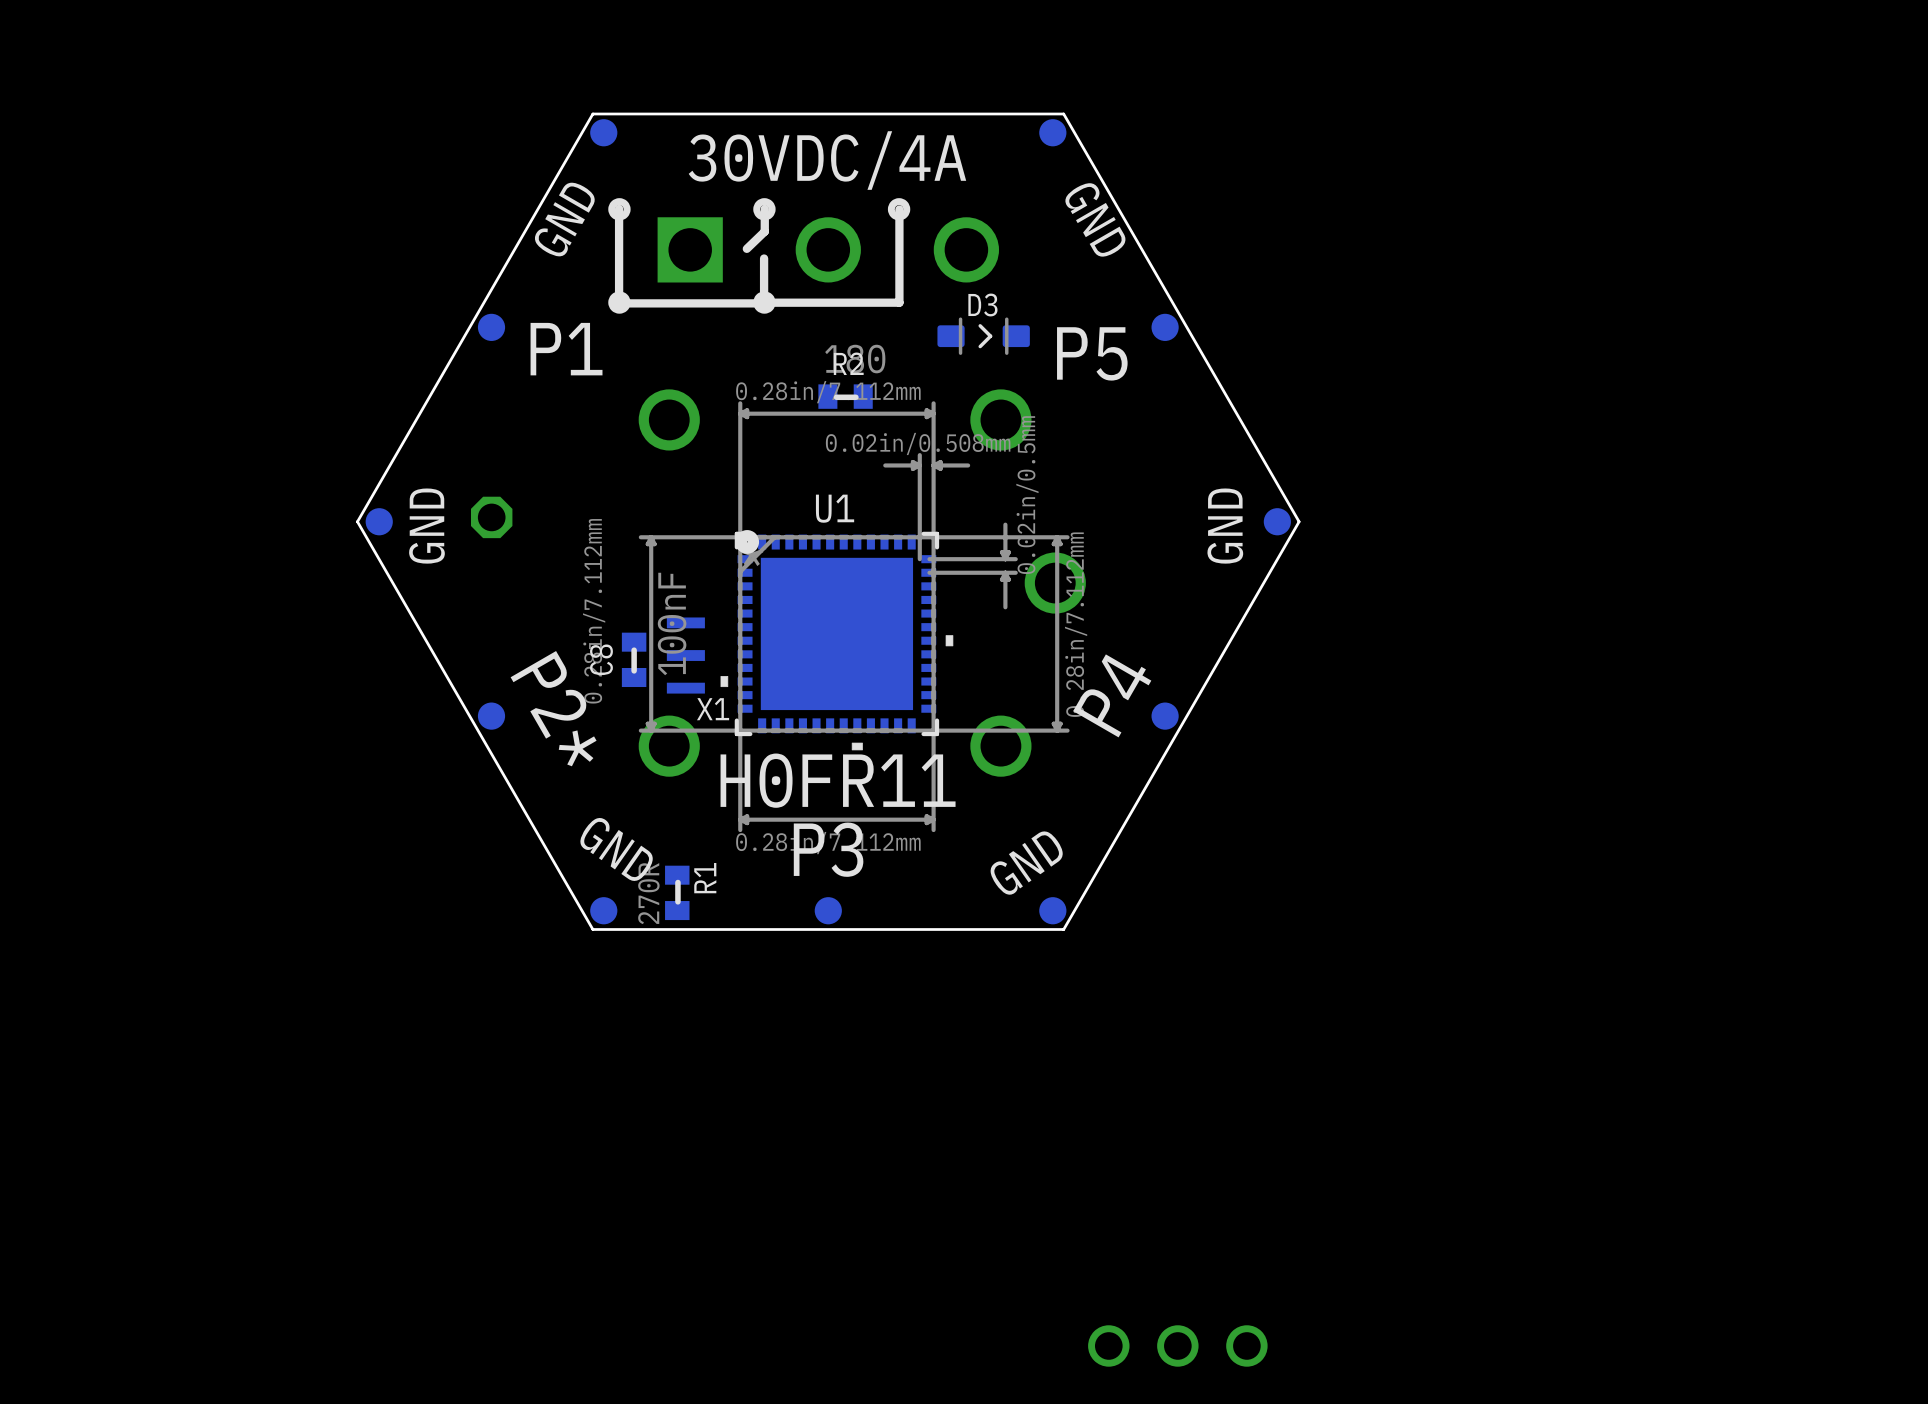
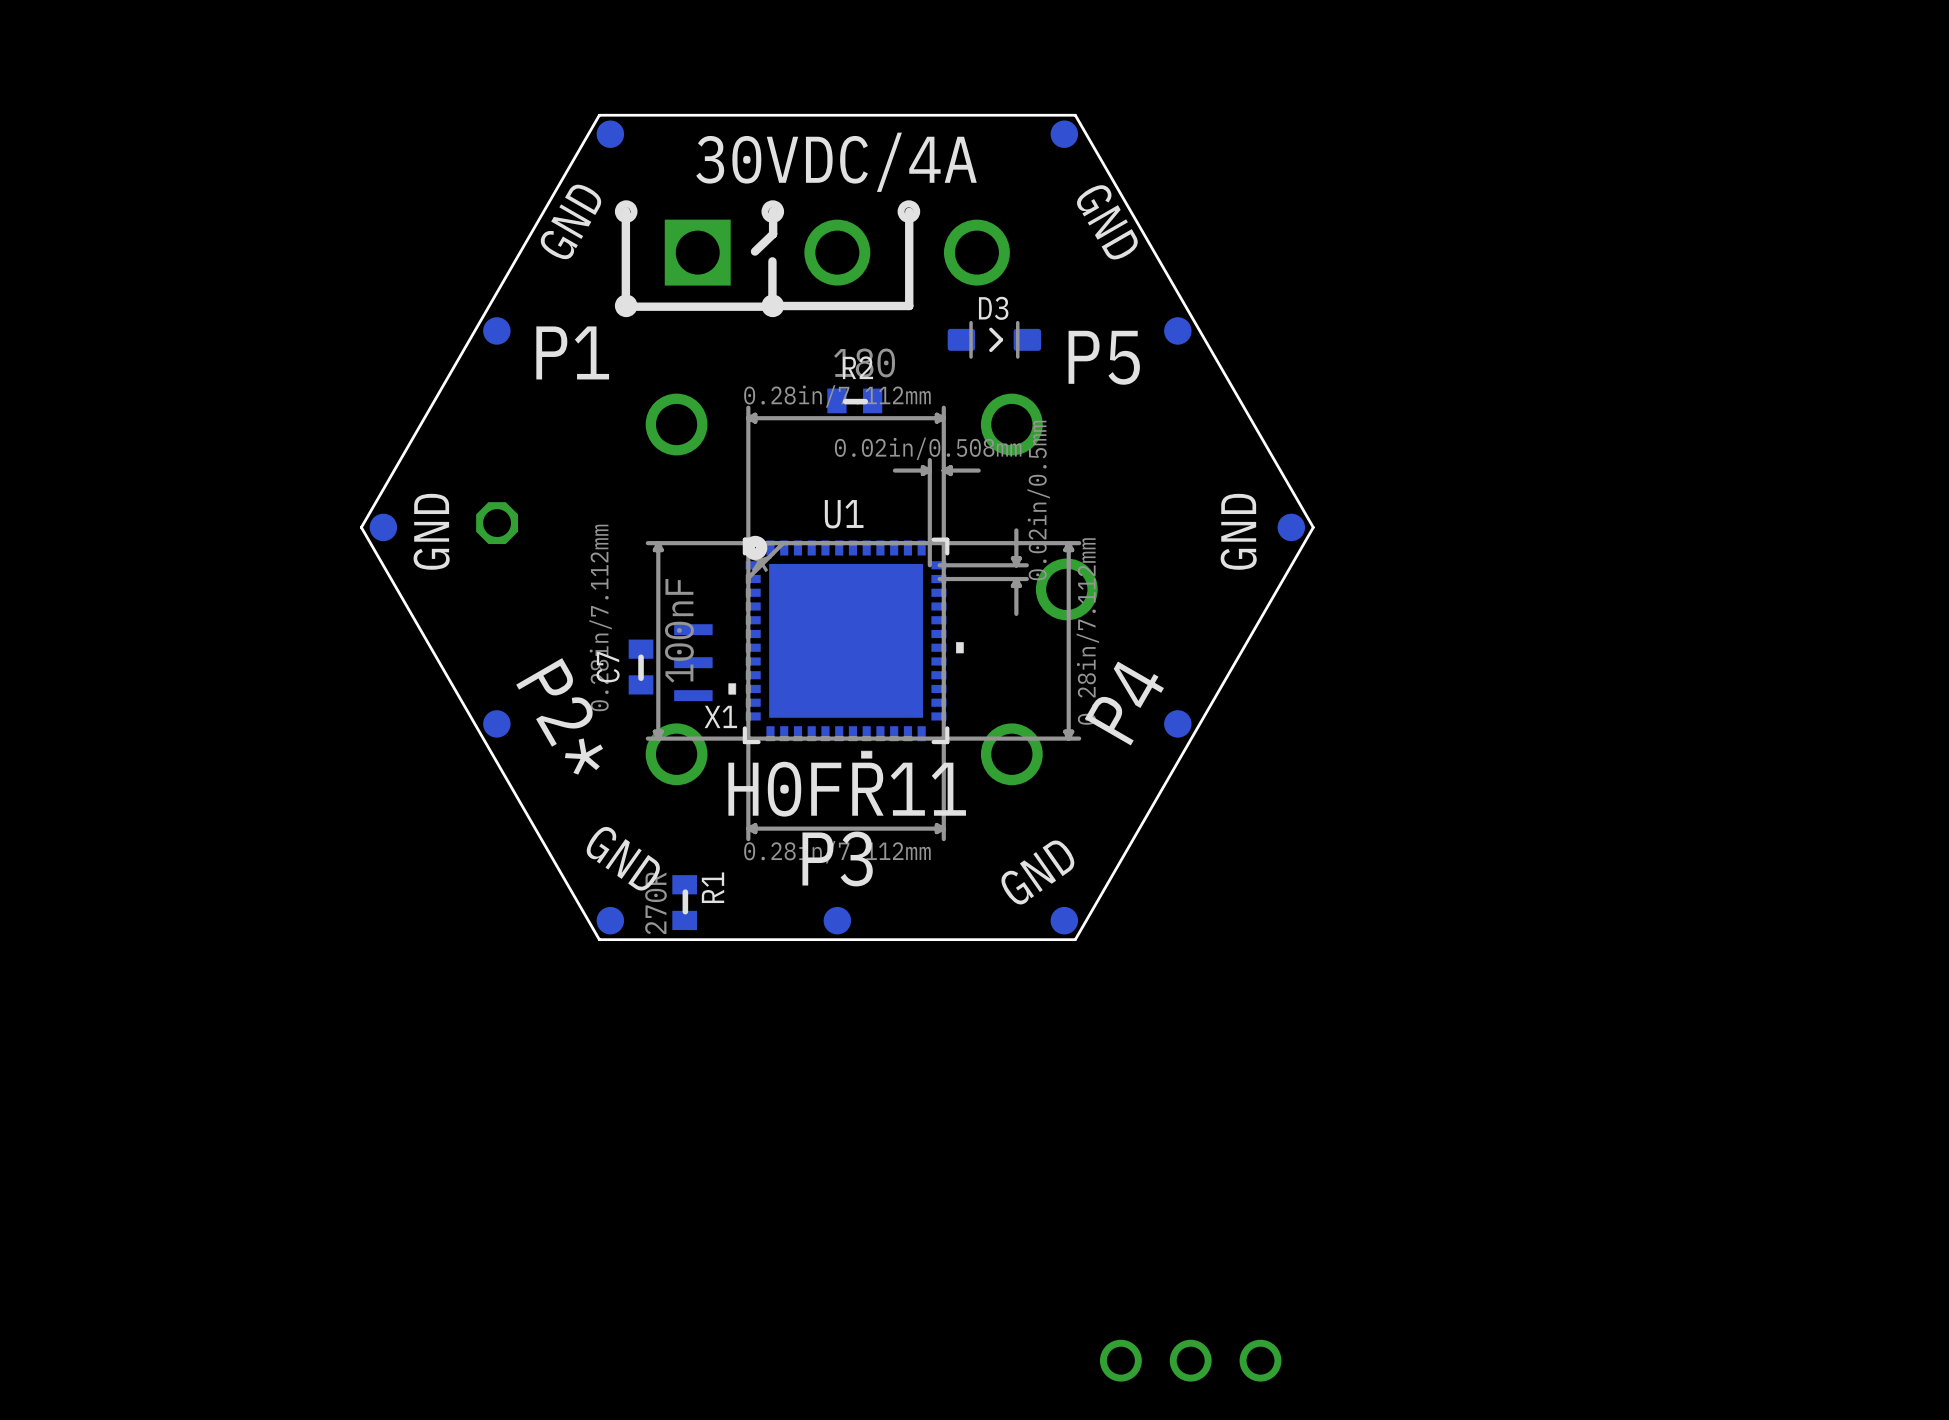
C8 name: C8 (601, 659) -> C7 (608, 667)

